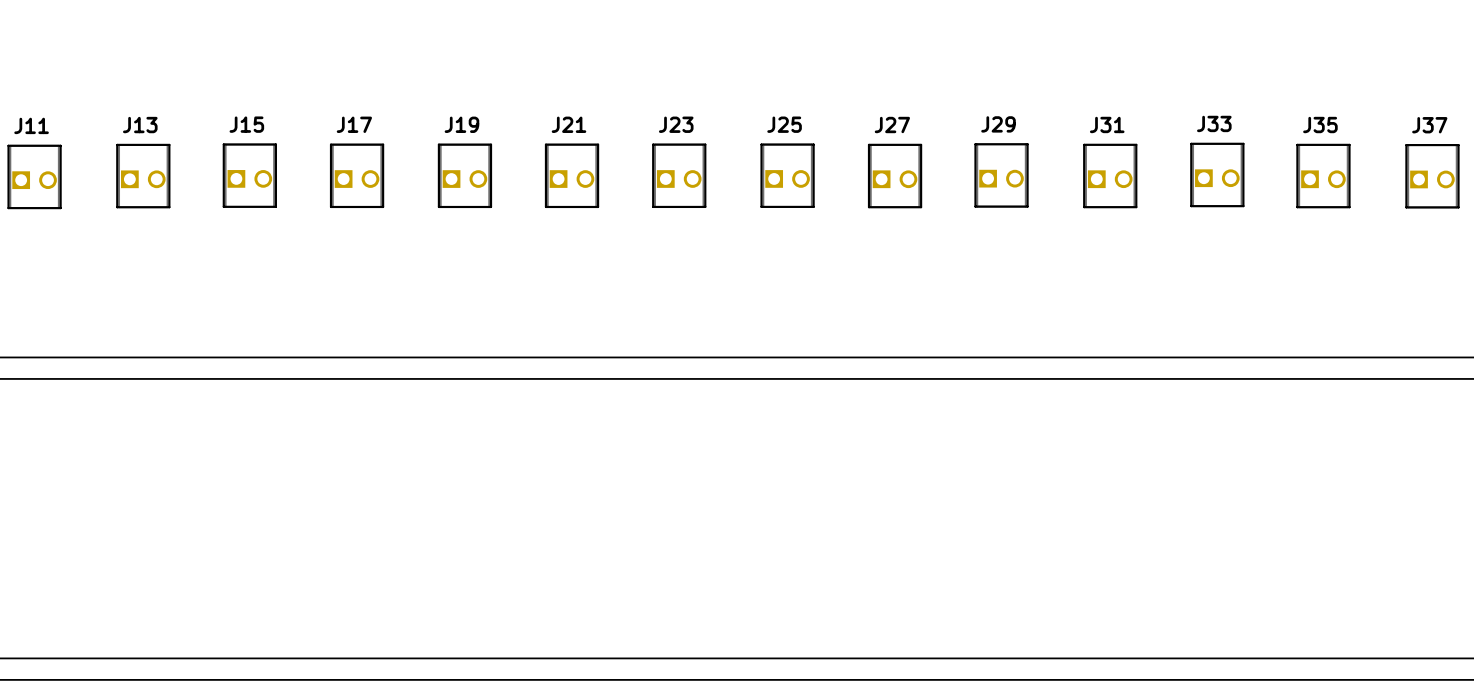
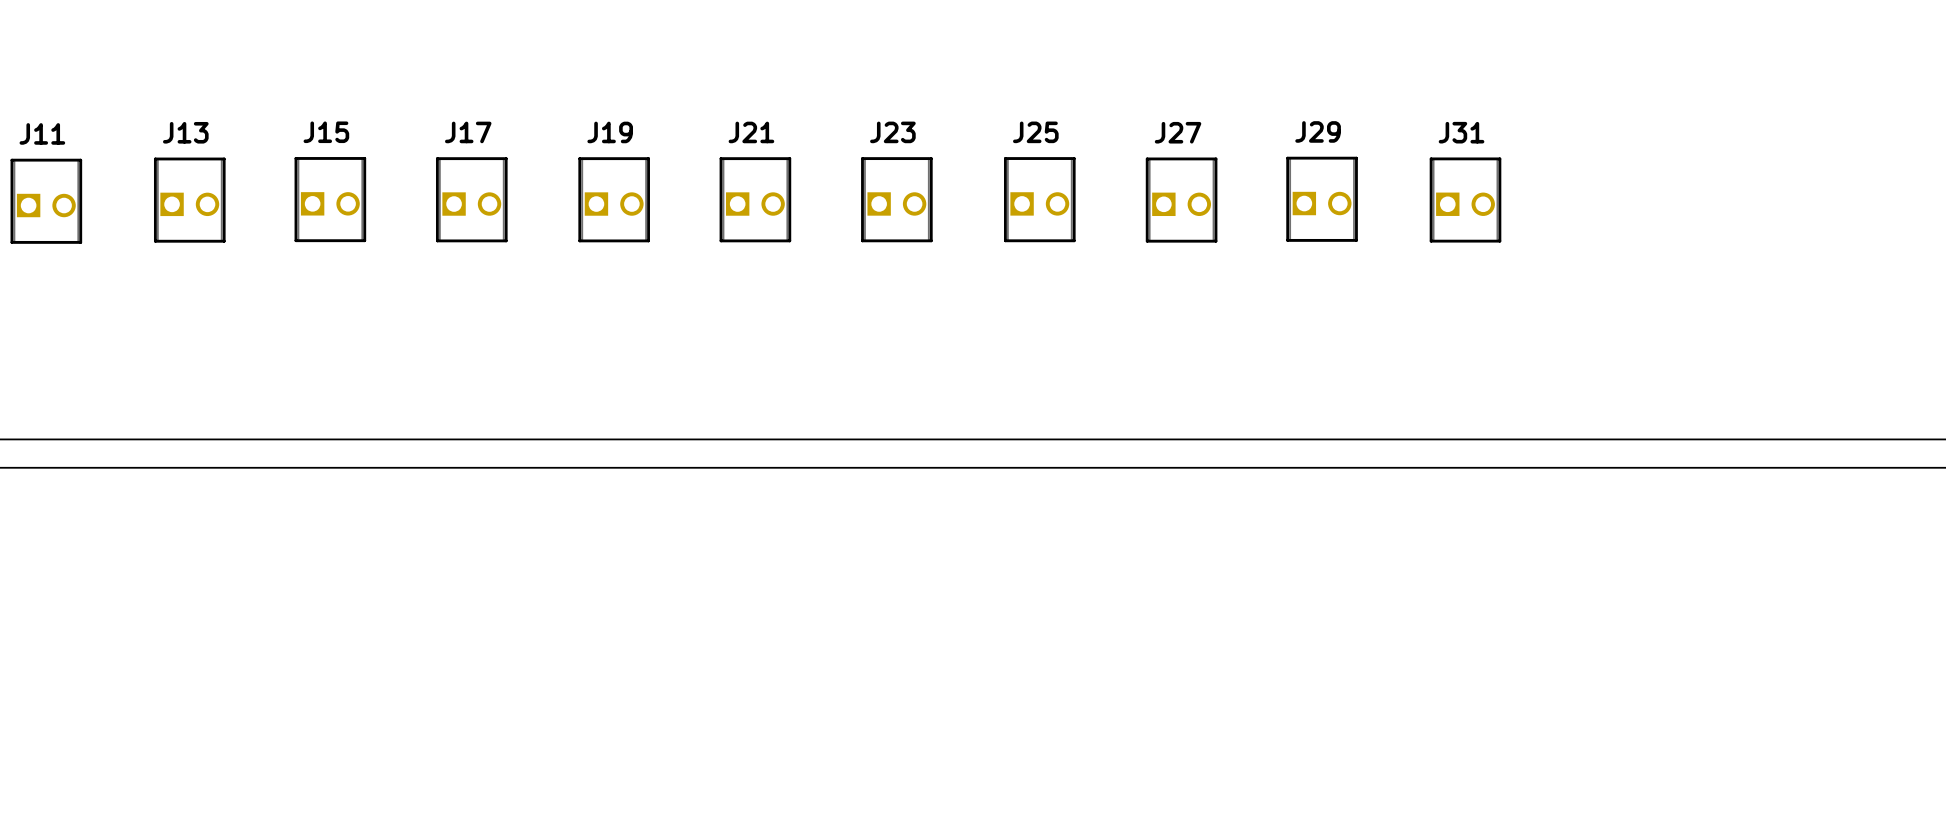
J33: (1217, 174) -> none
J35: (1323, 176) -> none
J37: (1432, 176) -> none

